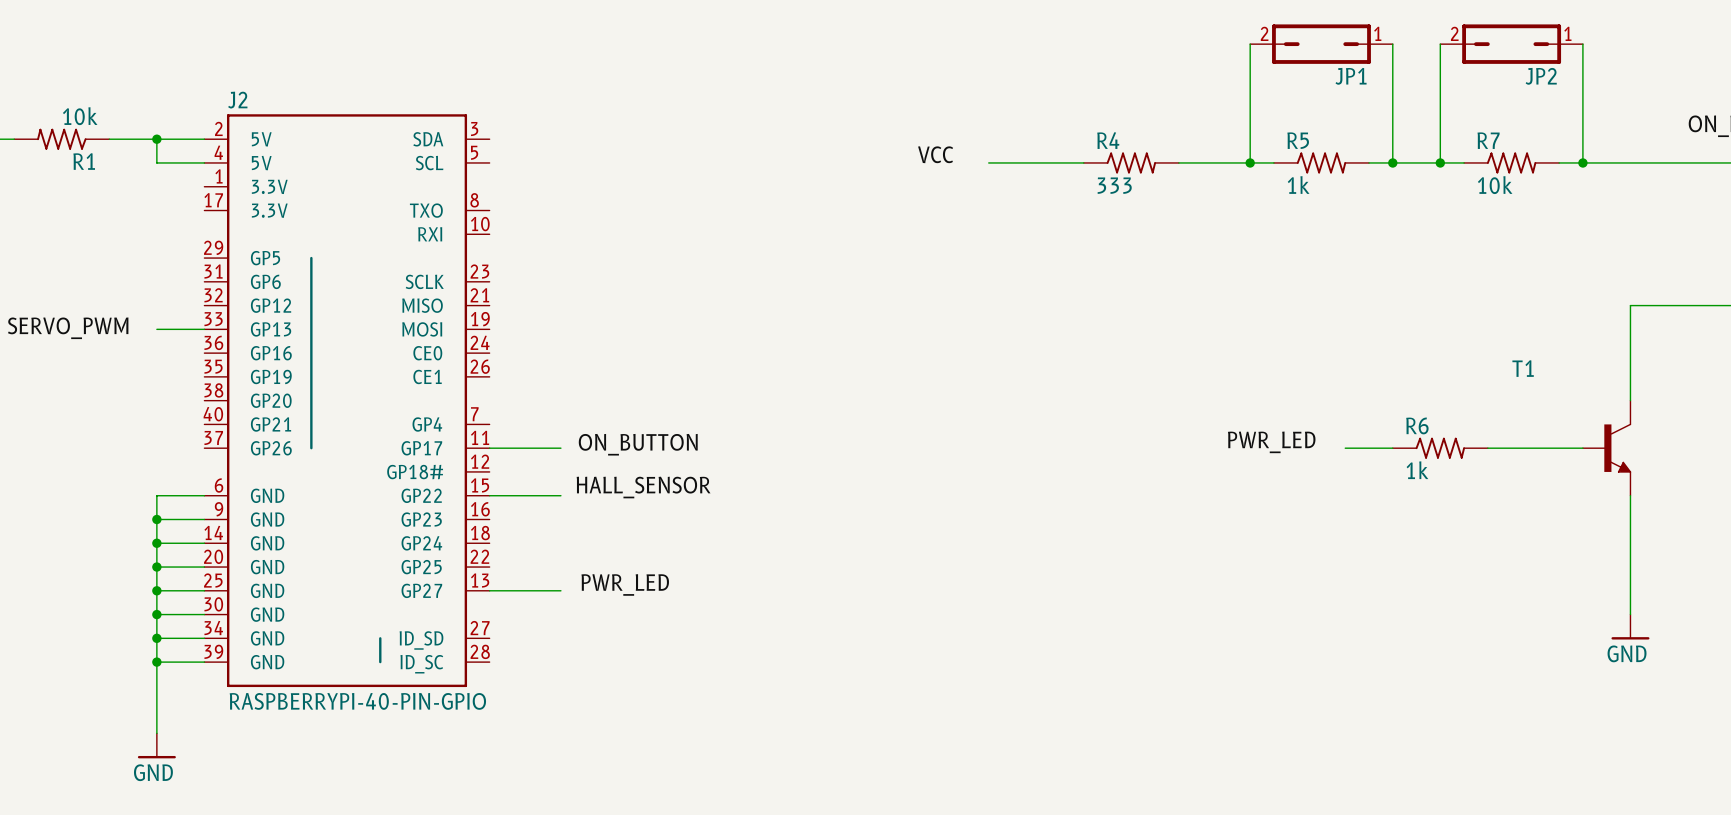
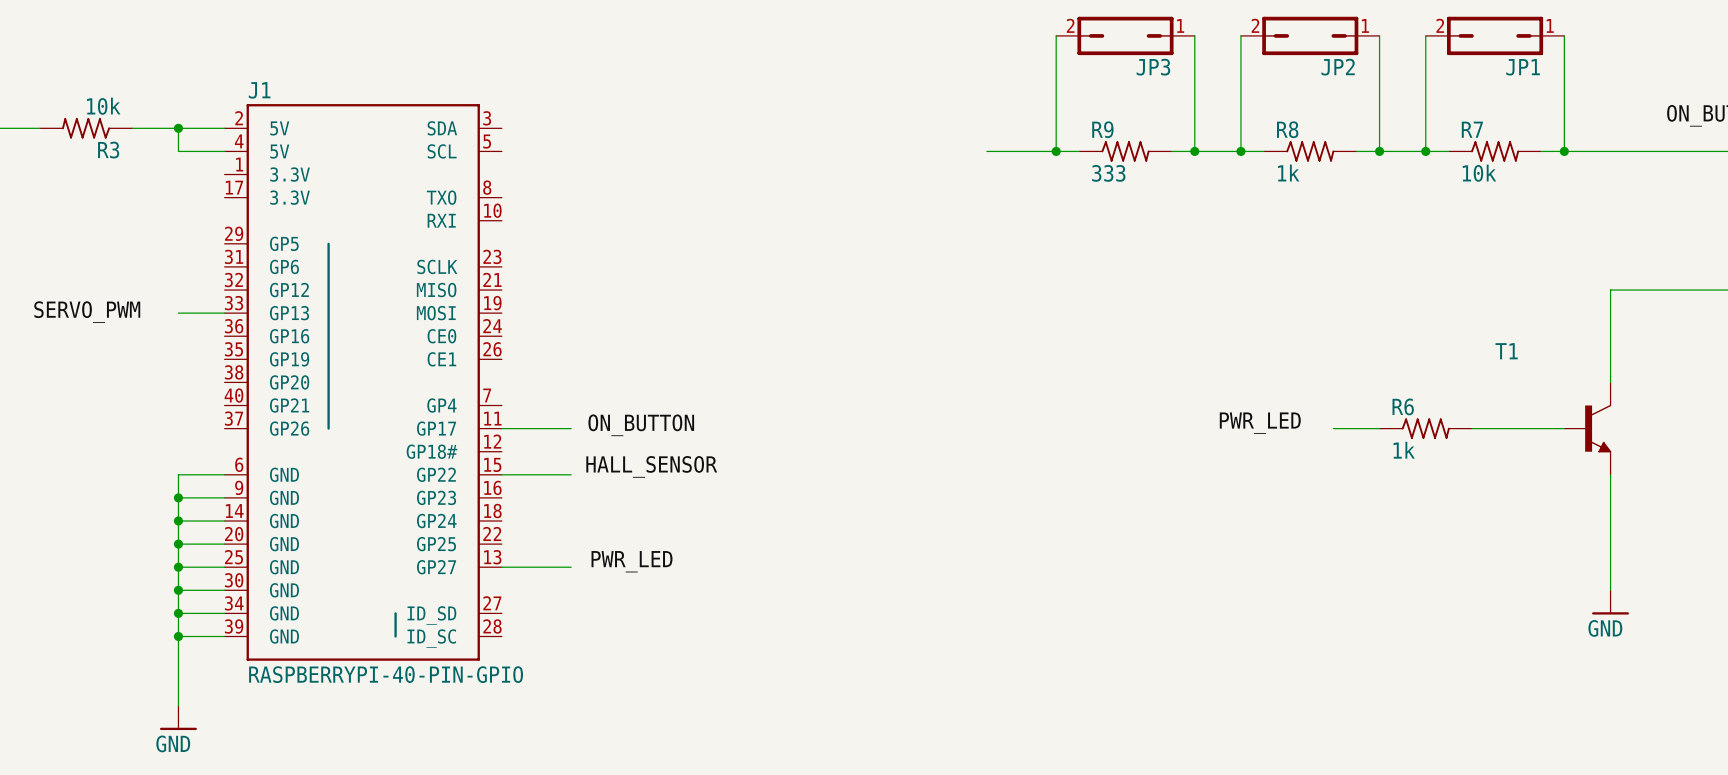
wire: none -> (1056, 35) (1056, 151)
JP3: none -> (1125, 35)
wire: none -> (1194, 35) (1194, 151)
JP1 name: JP1 (1351, 76) -> JP2 (1338, 67)
JP2 name: JP2 (1541, 76) -> JP1 (1523, 67)
J2 name: J2 (237, 100) -> J1 (259, 90)
R4 name: R4 (1108, 140) -> R9 (1102, 129)
R5 name: R5 (1298, 140) -> R8 (1287, 129)
label: VCC (935, 154) -> none
R1 name: R1 (84, 161) -> R3 (108, 150)
junction: none -> (1056, 151)
junction: none -> (1194, 151)

